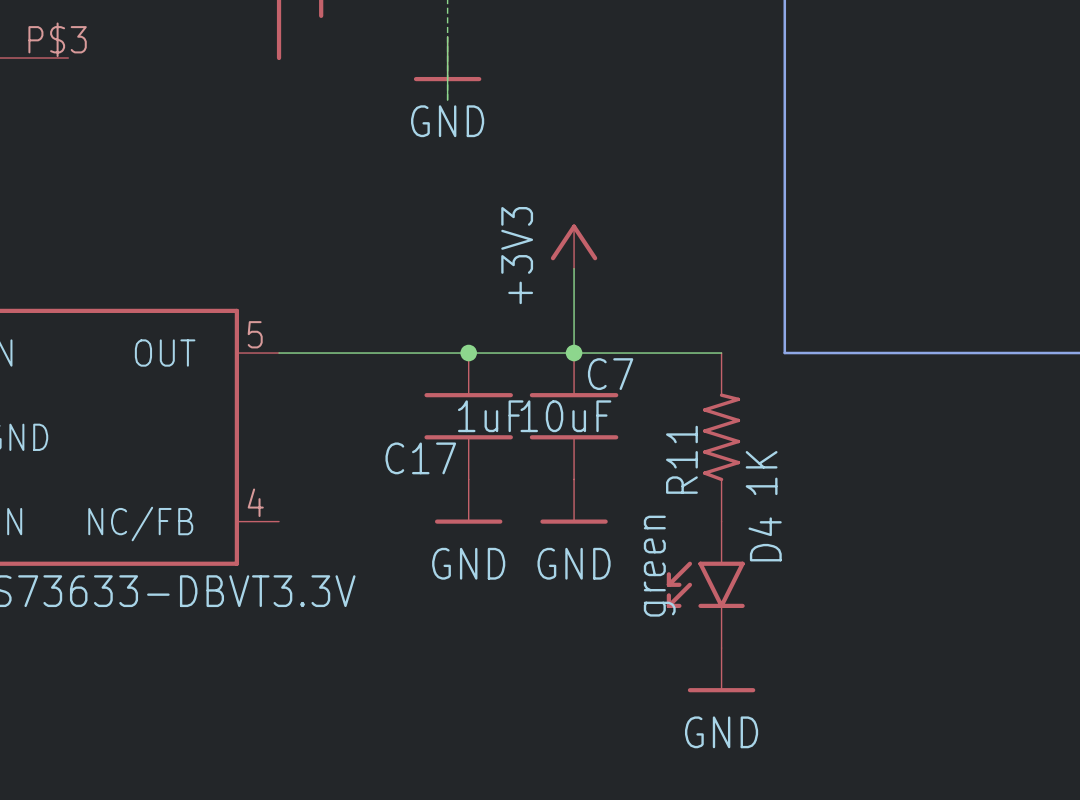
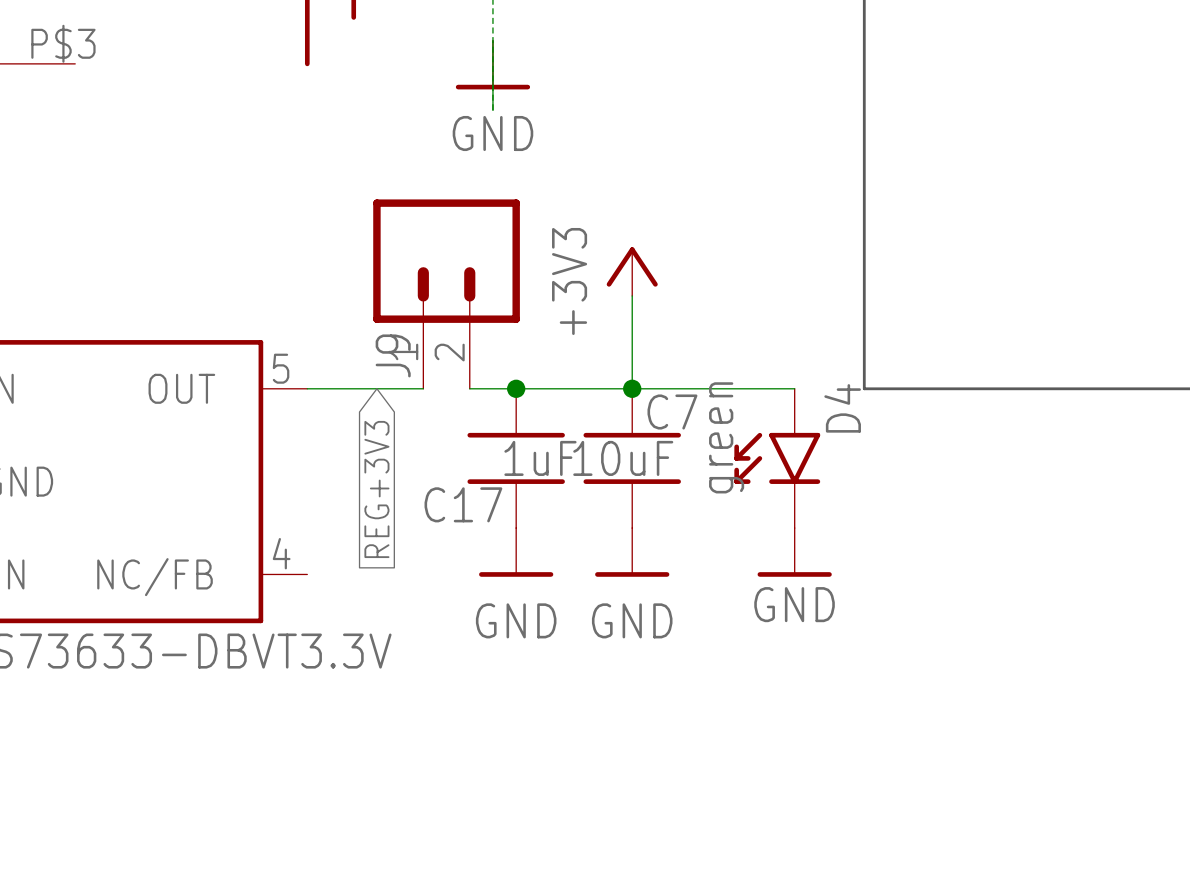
J9: none -> (446, 294)
wire: (384, 353) (426, 353) -> none
R11: 1K (721, 437) -> none
global label: none -> REG+3V3 (376, 489)
D4 position: (705, 584) -> (777, 458)
power symbol position: GND (721, 670) -> GND (794, 552)
power symbol text position: GND (721, 732) -> GND (794, 604)

